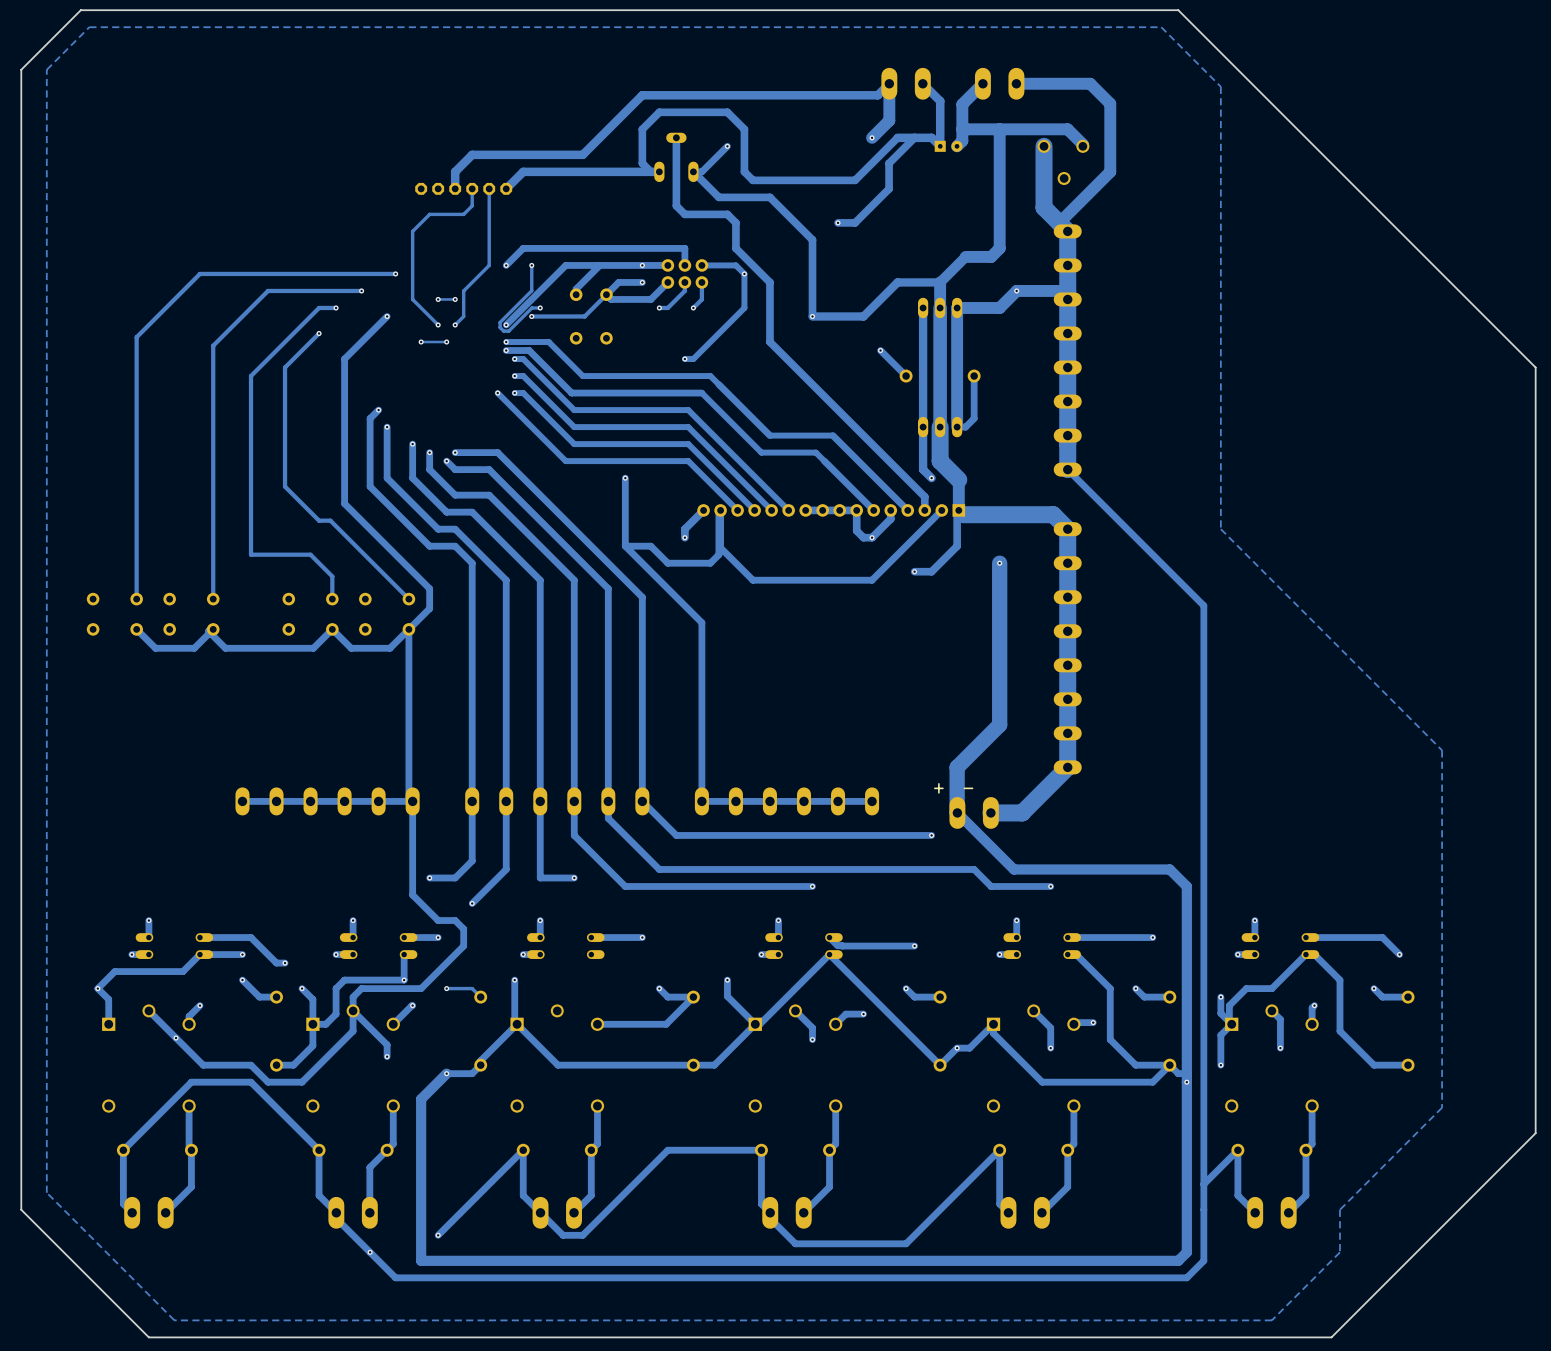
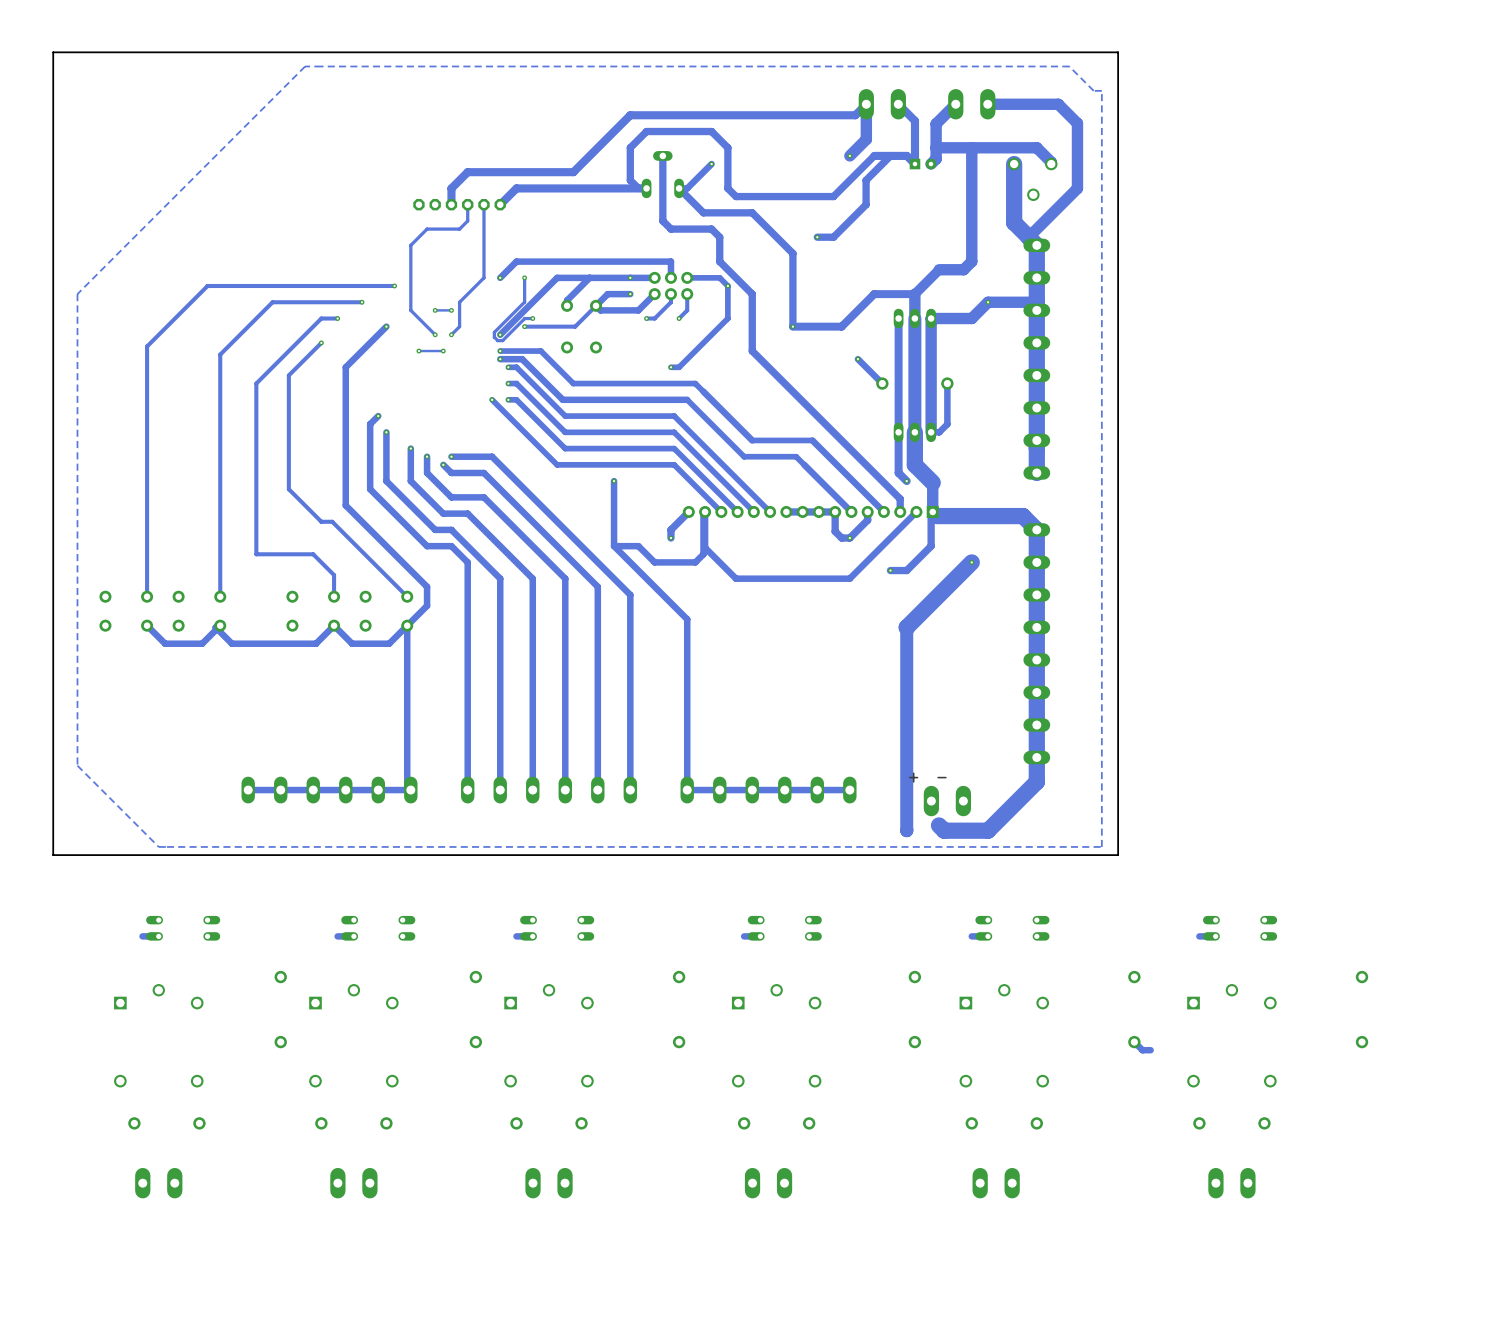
board edge: (1178, 10) (1535, 367) (1535, 1133) (1331, 1337) (148, 1337) (21, 1209) (21, 69) (80, 10) (1178, 10) -> none
zone outline: (1161, 27) (89, 27) (46, 69) (46, 1192) (174, 1320) (1271, 1320) (1339, 1252) (1339, 1209) (1442, 1107) (1442, 750) (1220, 529) (1220, 86) (1161, 27) -> none
board edge: none -> (1118, 52) (53, 52) (53, 855) (1118, 855) (1118, 52)
zone outline: none -> (1069, 66) (1093, 90) (1101, 90) (1101, 846) (158, 846) (77, 765) (77, 294) (305, 66) (1069, 66)
track: (1067, 469) (1203, 605) (1203, 1260) (1186, 1277) (395, 1277) (336, 1218) (336, 1212) (319, 1195) (319, 1150) (251, 1082) (191, 1082) (123, 1150) (123, 1204) (132, 1212) -> none
track: (999, 563) (999, 724) (957, 767) (957, 812) (1013, 869) (1169, 869) (1186, 886) (1186, 1252) (1178, 1260) (421, 1260) (421, 1099) (446, 1073) (472, 1073) (480, 1065) (480, 1060) (517, 1024) -> (971, 562) (906, 627)
track: none -> (906, 627) (906, 830)
track: (1067, 767) (1022, 812) (990, 812) -> (1036, 757) (1036, 781) (988, 830) (944, 830) (939, 825)
track: (412, 801) (412, 895) (438, 920) (455, 920) (463, 929) (463, 946) (421, 988) (361, 988) (353, 997) (353, 1031) (302, 1082) (268, 1082) (251, 1065) (203, 1065) (148, 1010) -> none
track: (472, 801) (472, 860) (455, 877) (429, 877) -> none
track: (506, 801) (506, 869) (472, 903) -> none
track: (540, 801) (540, 877) (574, 877) -> none
track: (574, 801) (574, 835) (625, 886) (812, 886) -> none
track: (608, 801) (608, 818) (659, 869) (974, 869) (991, 886) (1050, 886) -> none
track: (642, 801) (676, 835) (931, 835) -> none
via: (931, 835) -> none
via: (429, 877) -> none
via: (574, 877) -> none
via: (812, 886) -> none
via: (1050, 886) -> none
via: (472, 903) -> none
track: (148, 920) (148, 937) -> none
via: (148, 920) -> none
track: (353, 920) (353, 937) -> none
via: (353, 920) -> none
track: (540, 920) (540, 937) -> none
via: (540, 920) -> none
track: (778, 920) (778, 937) -> none
via: (778, 920) -> none
track: (1016, 920) (1016, 937) -> none
via: (1016, 920) -> none
track: (1254, 920) (1254, 937) -> none
via: (1254, 920) -> none
track: (199, 937) (251, 937) (276, 963) (285, 963) -> none
track: (438, 937) (404, 937) -> none
via: (438, 937) -> none
track: (642, 937) (591, 937) -> none
via: (642, 937) -> none
track: (829, 937) (837, 945) (914, 946) -> none
track: (1152, 937) (1067, 937) -> none
via: (1152, 937) -> none
track: (1305, 937) (1382, 937) (1399, 954) -> none
via: (914, 946) -> none
via: (131, 954) -> none
track: (242, 954) (199, 954) (182, 971) (114, 971) (97, 988) (108, 999) (108, 1024) -> none
via: (242, 954) -> none
via: (336, 954) -> none
track: (404, 954) (404, 980) (344, 980) (336, 988) (336, 1014) (325, 1024) (312, 1024) -> none
via: (523, 954) -> none
via: (761, 954) -> none
via: (999, 954) -> none
track: (1067, 954) (1076, 954) (1110, 988) (1110, 1039) (1135, 1065) (1169, 1065) (1152, 1082) (1042, 1082) (993, 1033) (993, 1024) (969, 1048) (957, 1048) (940, 1065) (829, 954) (759, 1024) (755, 1024) -> none
via: (1237, 954) -> none
via: (1399, 954) -> none
via: (285, 963) -> none
track: (242, 980) (259, 997) (276, 997) -> none
via: (242, 980) -> none
via: (404, 980) -> none
track: (514, 980) (514, 1021) (557, 1065) (714, 1065) (755, 1024) -> none
via: (514, 980) -> none
track: (727, 980) (727, 996) (755, 1024) -> none
via: (727, 980) -> none
via: (97, 988) -> none
track: (302, 988) (312, 999) (312, 1045) (293, 1065) (276, 1065) -> none
via: (302, 988) -> none
track: (446, 988) (472, 988) (480, 997) -> none
via: (446, 988) -> none
track: (659, 988) (667, 997) (693, 997) (666, 1024) (597, 1024) -> none
via: (659, 988) -> none
track: (906, 988) (914, 997) (940, 997) -> none
via: (906, 988) -> none
track: (1135, 988) (1144, 997) (1169, 997) -> none
via: (1135, 988) -> none
track: (1374, 988) (1382, 997) (1408, 997) -> none
via: (1374, 988) -> none
track: (1220, 997) (1220, 1013) (1231, 1024) (1220, 1035) (1220, 1065) -> none
via: (1220, 997) -> none
track: (199, 1005) (189, 1016) (189, 1024) -> none
via: (199, 1005) -> none
track: (412, 1005) (393, 1024) -> none
via: (412, 1005) -> none
track: (1314, 1005) (1312, 1007) (1312, 1024) -> none
via: (1314, 1005) -> none
track: (353, 1010) (387, 1044) (387, 1056) -> none
track: (795, 1010) (812, 1027) (812, 1039) -> none
track: (1033, 1010) (1050, 1027) (1050, 1048) -> none
track: (1271, 1010) (1280, 1019) (1280, 1048) -> none
track: (863, 1014) (845, 1014) (835, 1024) -> none
via: (863, 1014) -> none
track: (1229, 1021) (1229, 1005) (1246, 988) (1271, 988) (1305, 954) (1314, 954) (1339, 980) (1339, 1031) (1374, 1065) (1408, 1065) -> none
track: (1093, 1022) (1075, 1022) (1073, 1024) -> none
via: (1093, 1022) -> none
via: (176, 1038) -> none
via: (812, 1039) -> none
via: (957, 1048) -> none
via: (1050, 1048) -> none
via: (1280, 1048) -> none
via: (387, 1056) -> none
via: (1220, 1065) -> none
via: (446, 1073) -> none
via: (1186, 1082) -> none
track: (189, 1106) (191, 1187) (165, 1212) -> none
track: (393, 1106) (393, 1144) (369, 1167) (369, 1212) -> none
track: (597, 1106) (597, 1144) (591, 1150) (591, 1195) (574, 1212) -> none
track: (835, 1106) (835, 1144) (829, 1150) (829, 1187) (803, 1212) -> none
track: (1073, 1106) (1073, 1144) (1067, 1150) (1067, 1187) (1041, 1212) -> none
track: (1312, 1106) (1312, 1144) (1305, 1150) (1305, 1195) (1288, 1212) -> none
track: (1203, 1184) (1237, 1150) (1237, 1195) (1255, 1212) -> none
track: (1008, 1212) (999, 1204) (999, 1150) (906, 1243) (795, 1243) (770, 1218) (770, 1212) (761, 1204) (761, 1150) (667, 1150) (582, 1235) (563, 1235) (523, 1195) (523, 1150) (438, 1235) -> none
via: (438, 1235) -> none
via: (370, 1252) -> none

